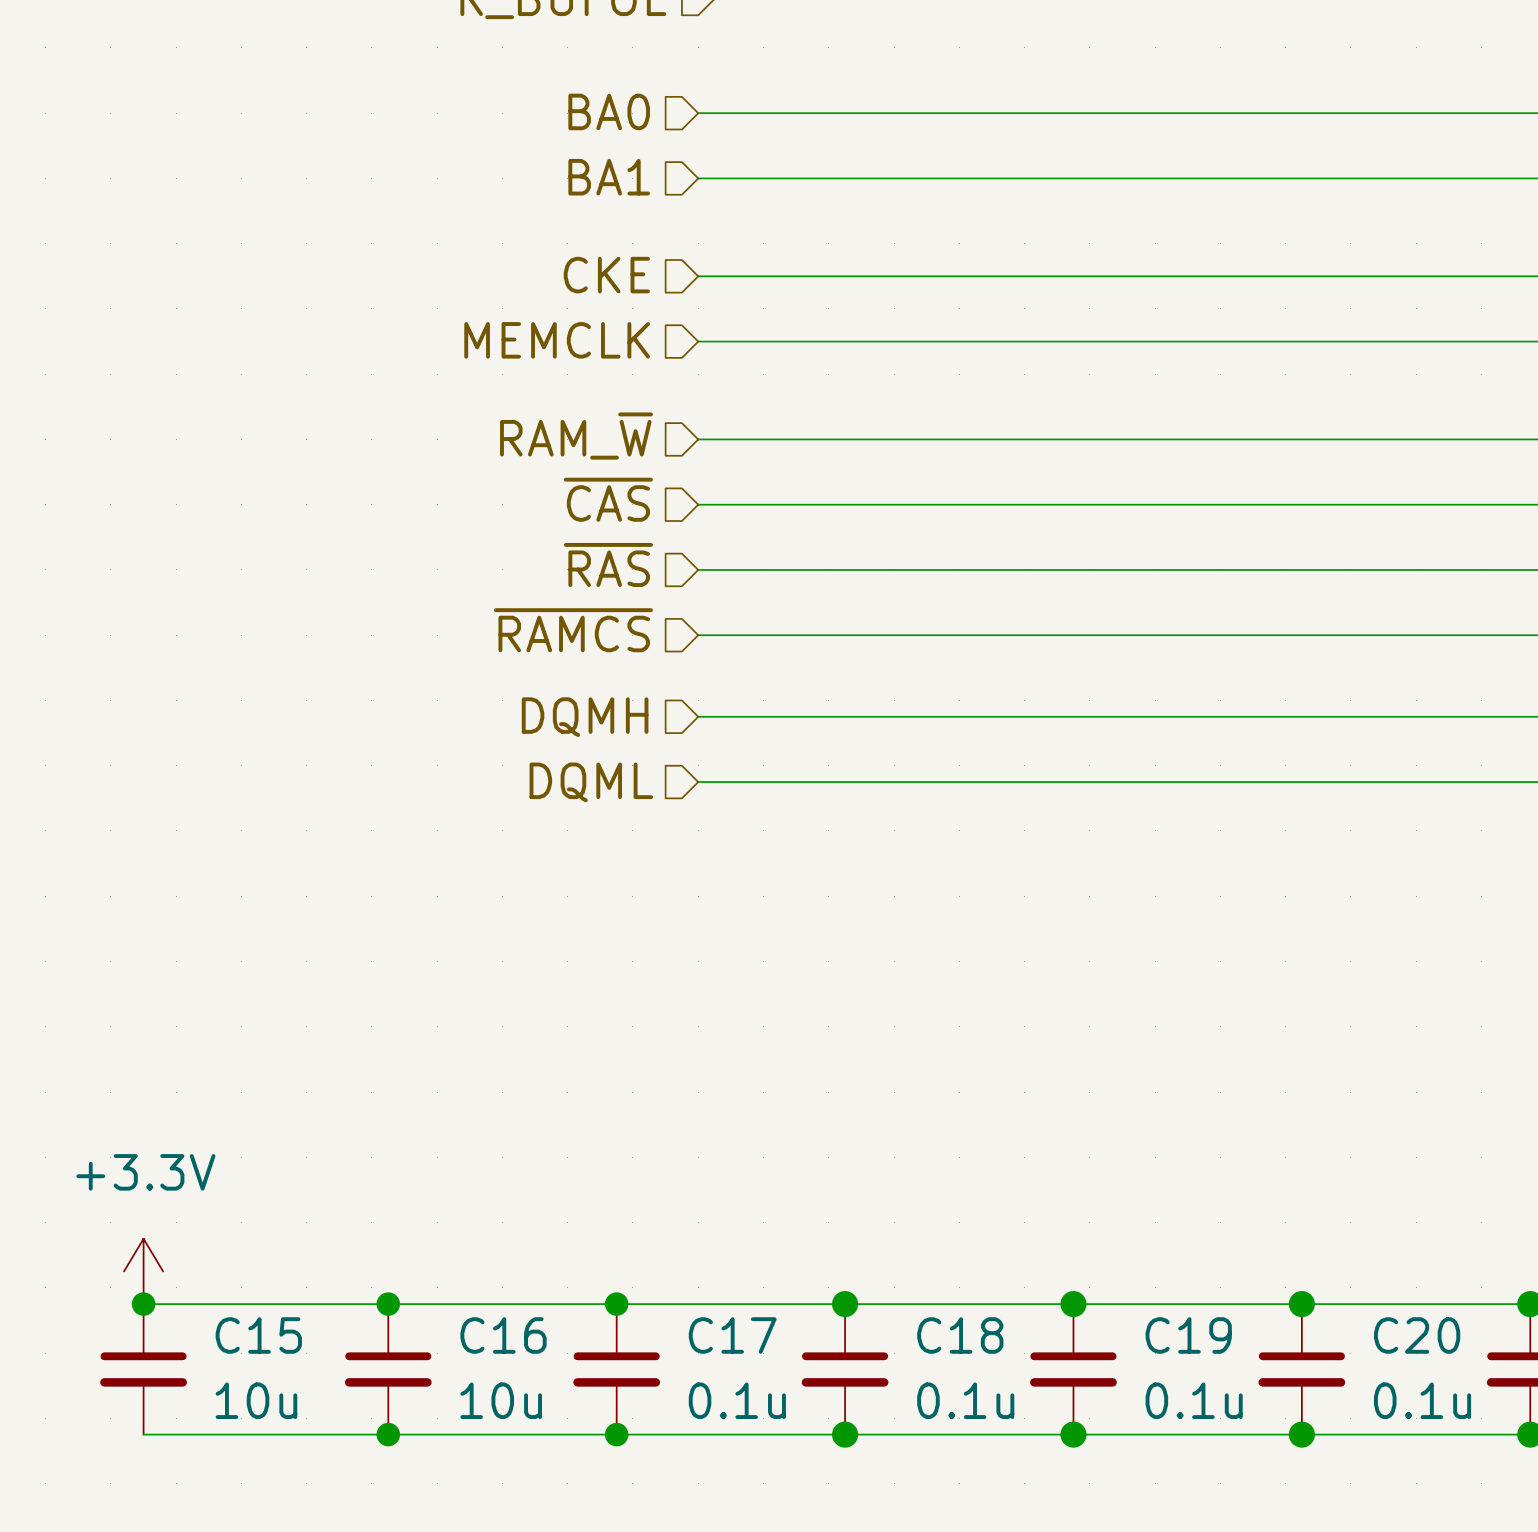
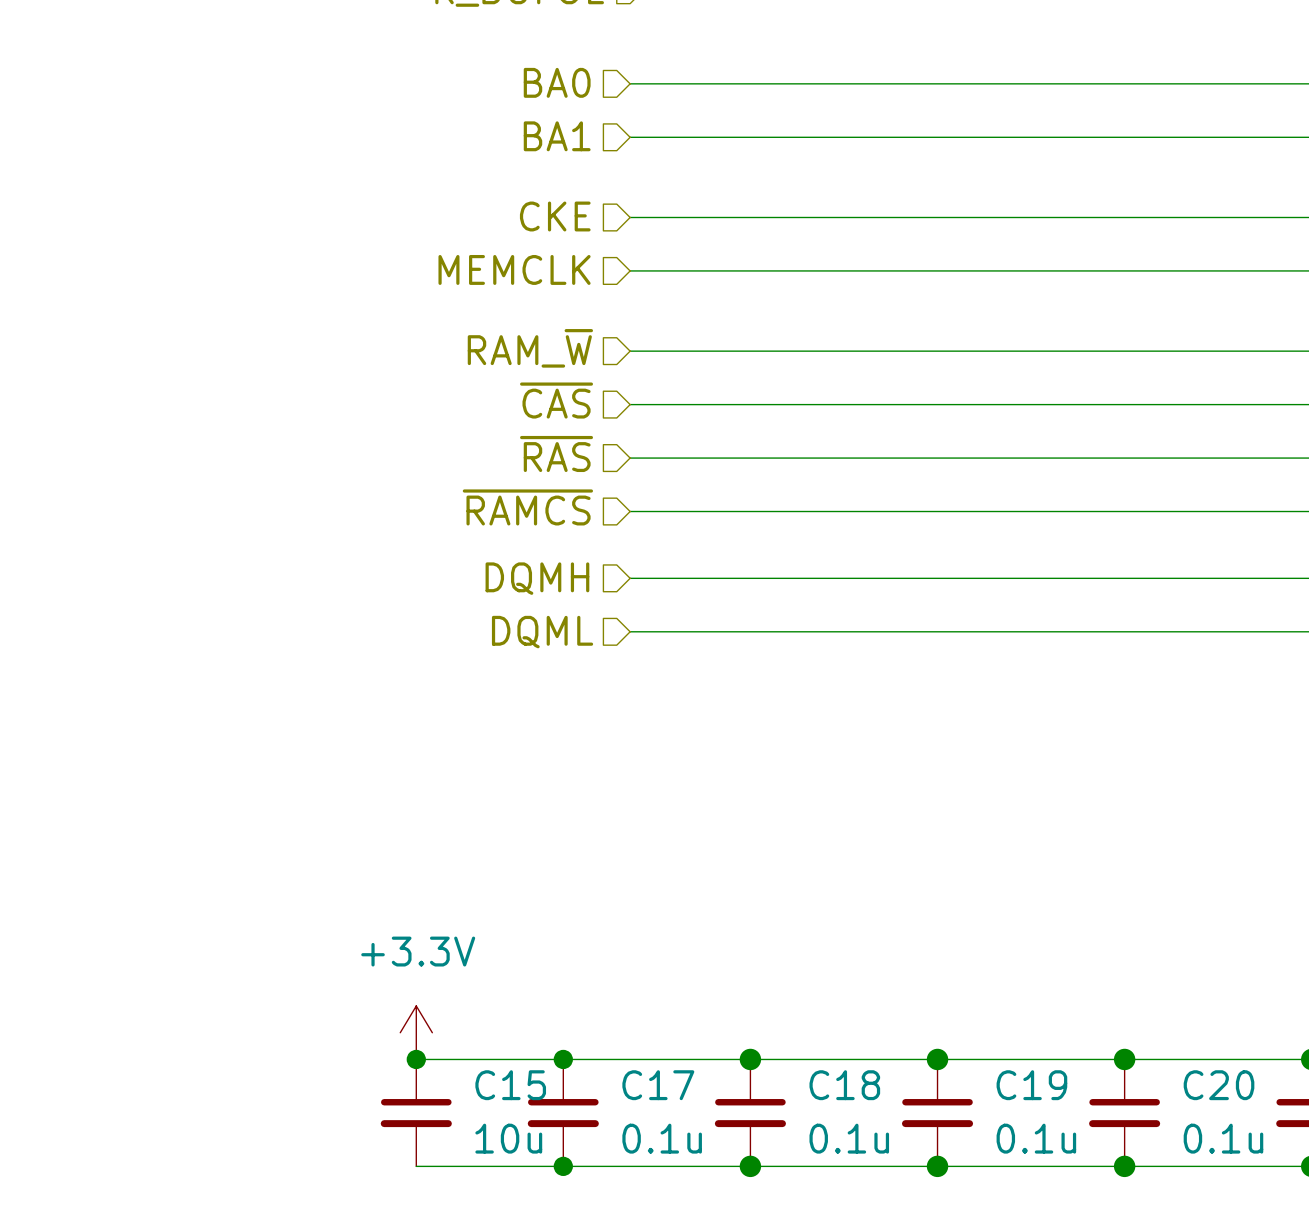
power symbol position: +3.3V (143, 1271) -> +3.3V (416, 1032)
wire: (143, 1304) (437, 1304) -> none
junction: (143, 1304) -> none
junction position: (388, 1304) -> (416, 1059)
C15 position: (143, 1369) -> (416, 1112)
C16: 10u (388, 1369) -> none
wire: (143, 1434) (437, 1434) -> none
junction: (388, 1434) -> none

